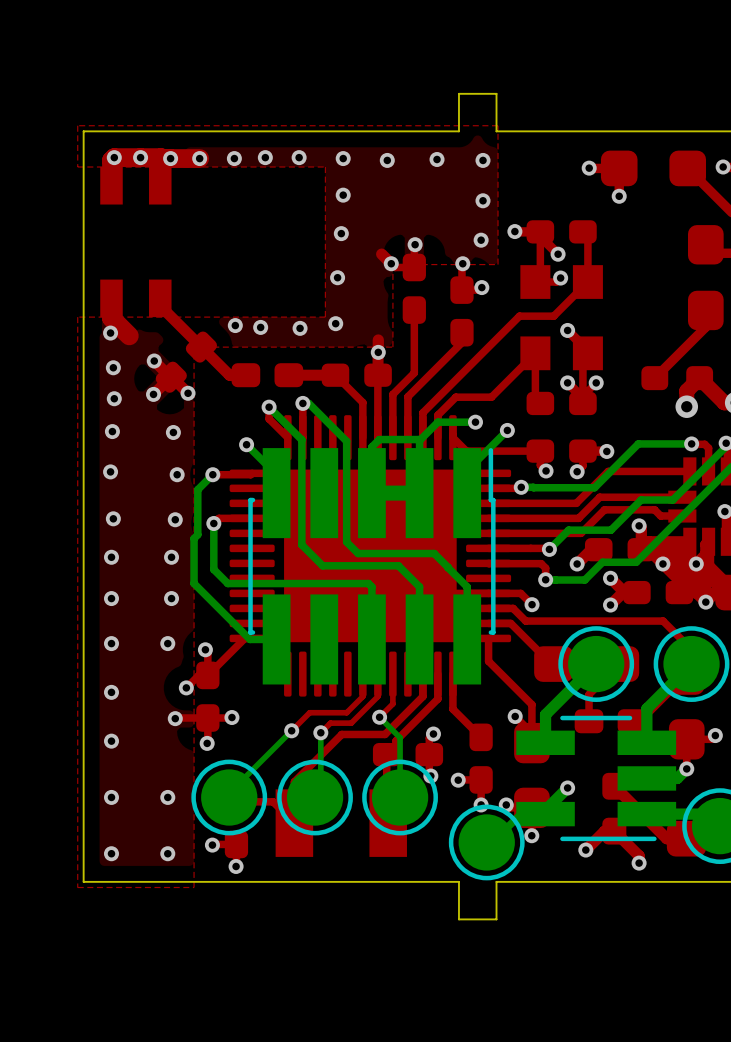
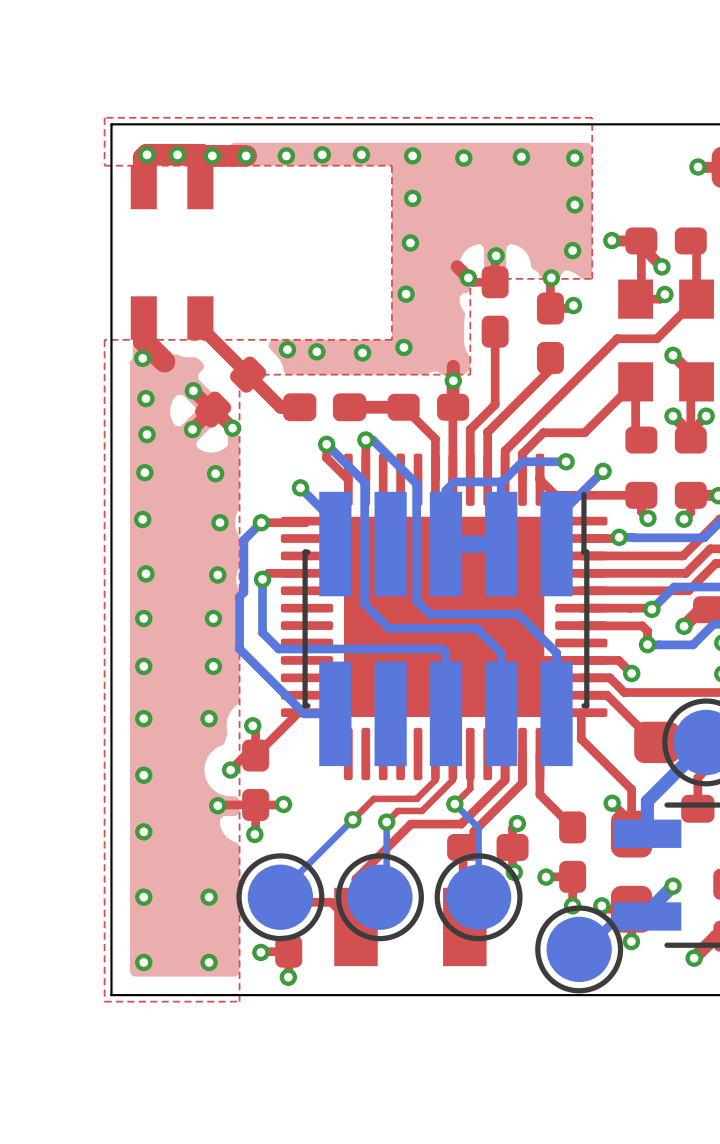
board edge: (496, 131) (496, 93) (458, 93) (458, 131) -> (590, 124) (546, 124)
board edge: (496, 881) (496, 919) (458, 919) (458, 881) -> (590, 995) (546, 995)

